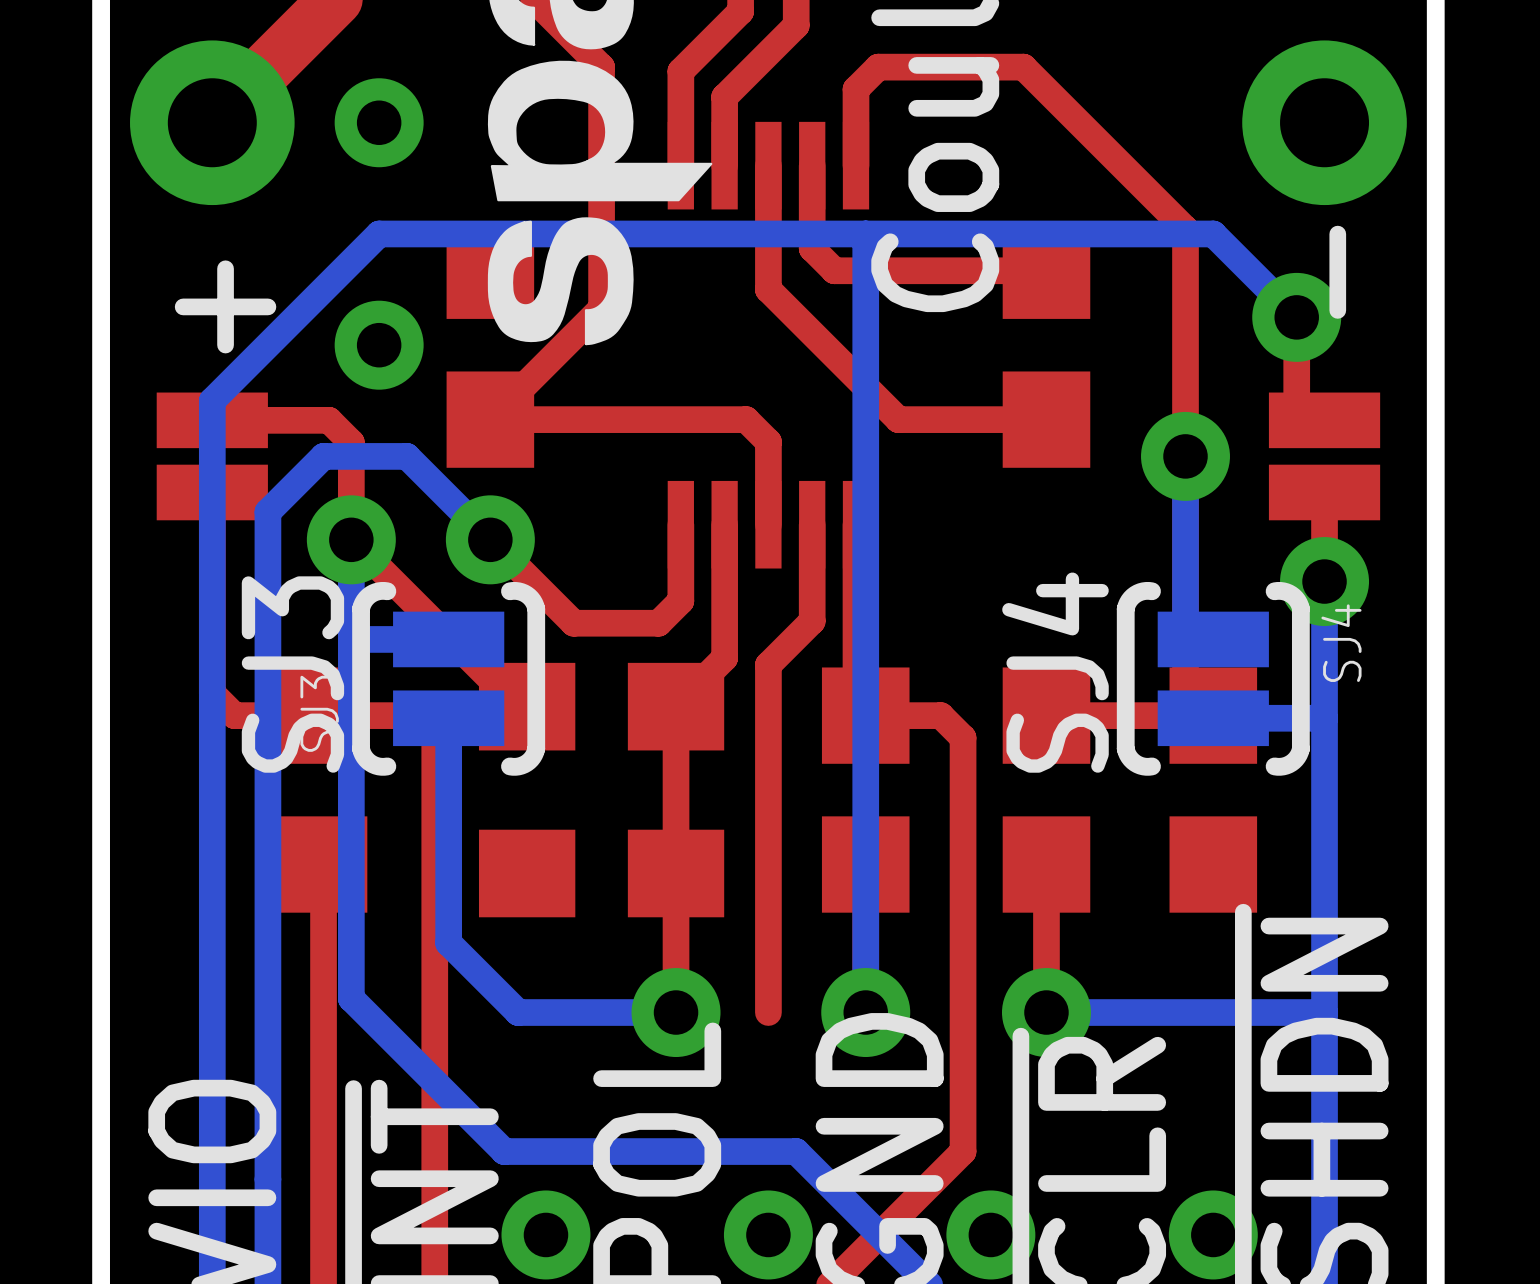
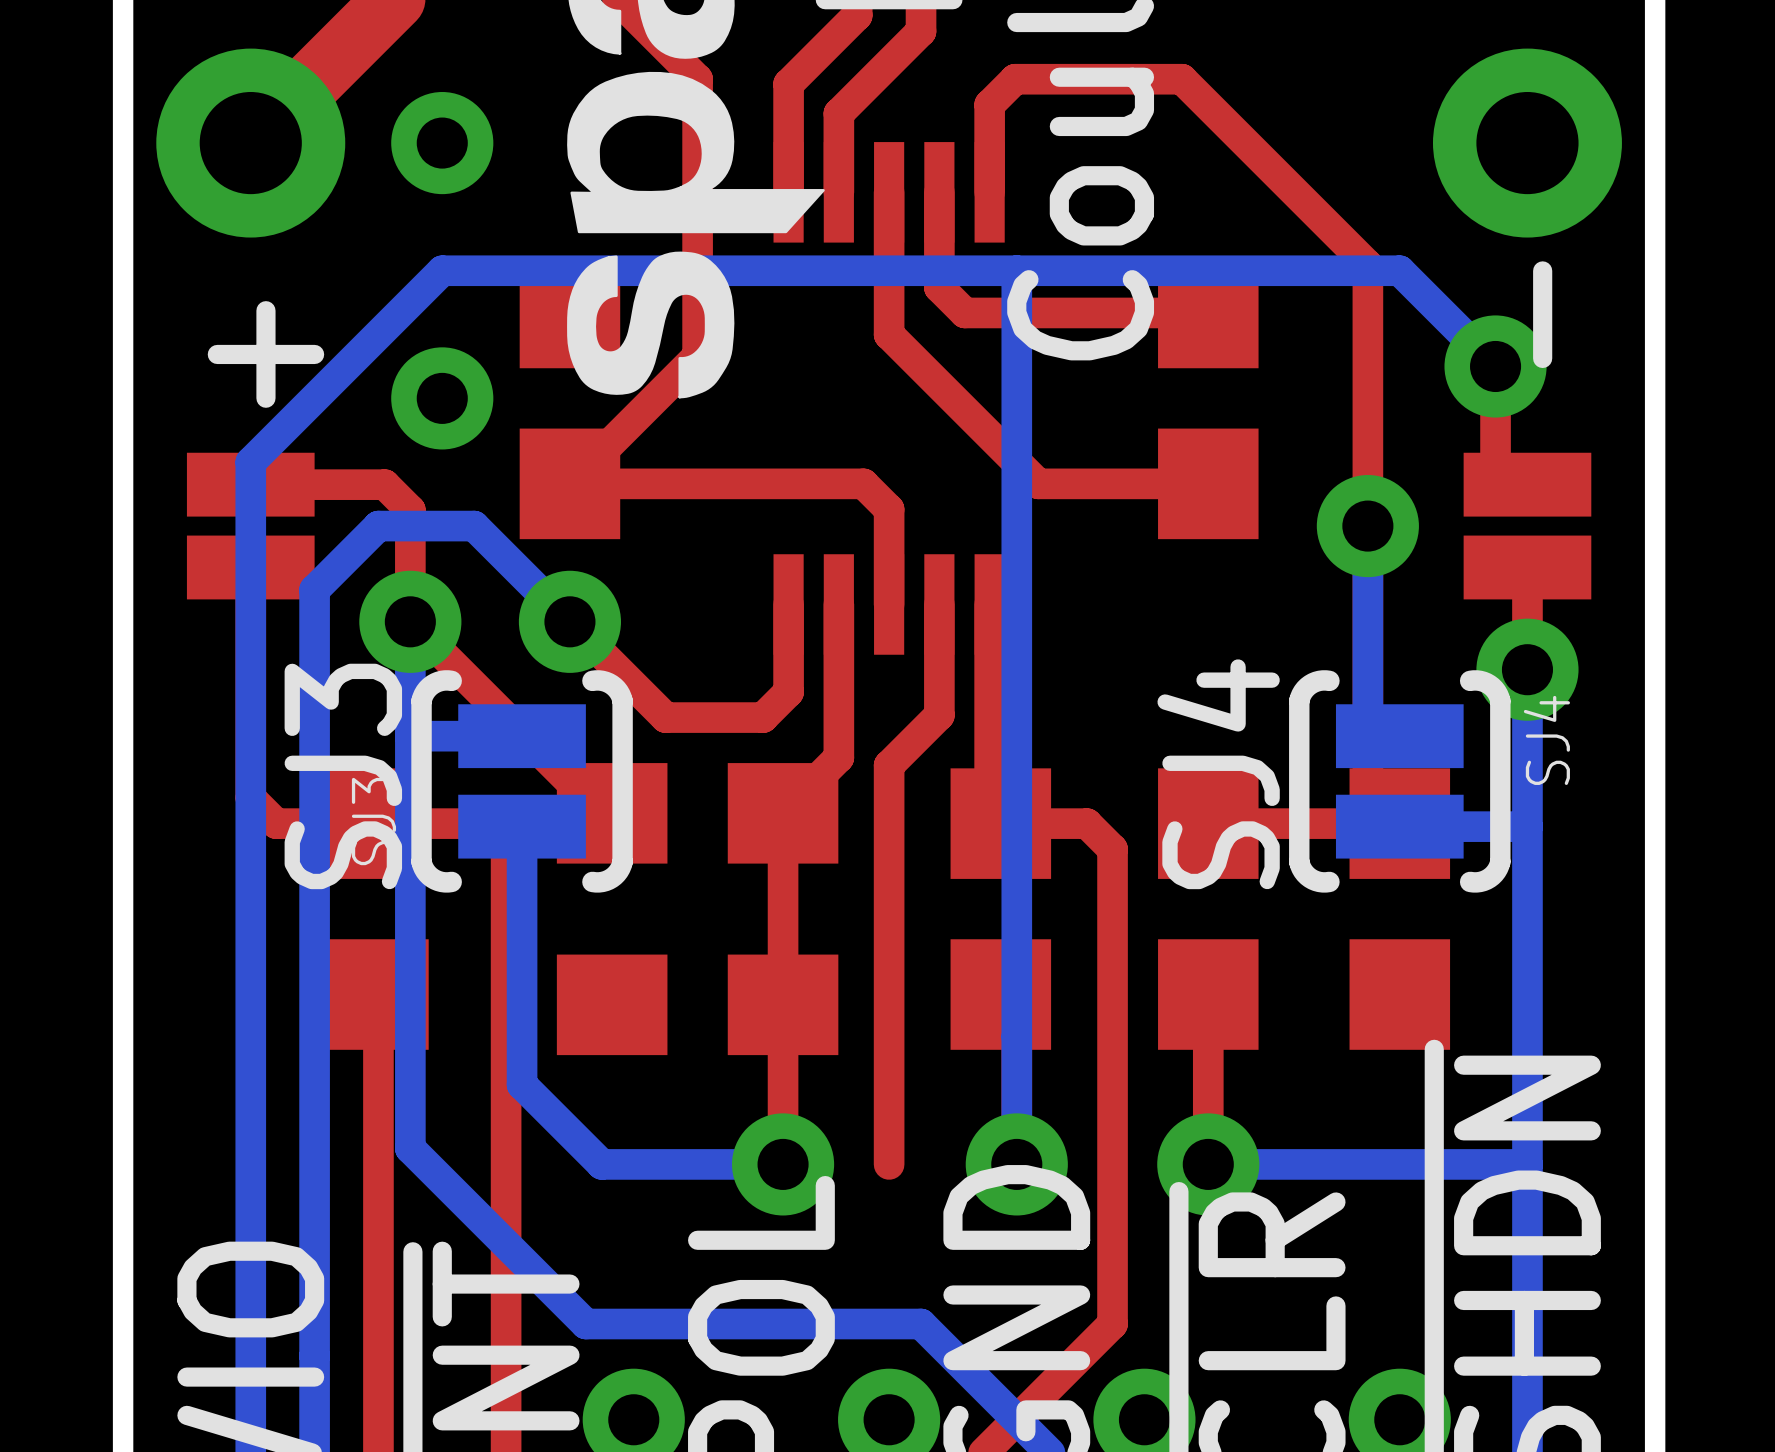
bottom track: (865, 233) (865, 1012) -> (1016, 270) (1016, 1164)
via position: (865, 1012) -> (1016, 1164)

